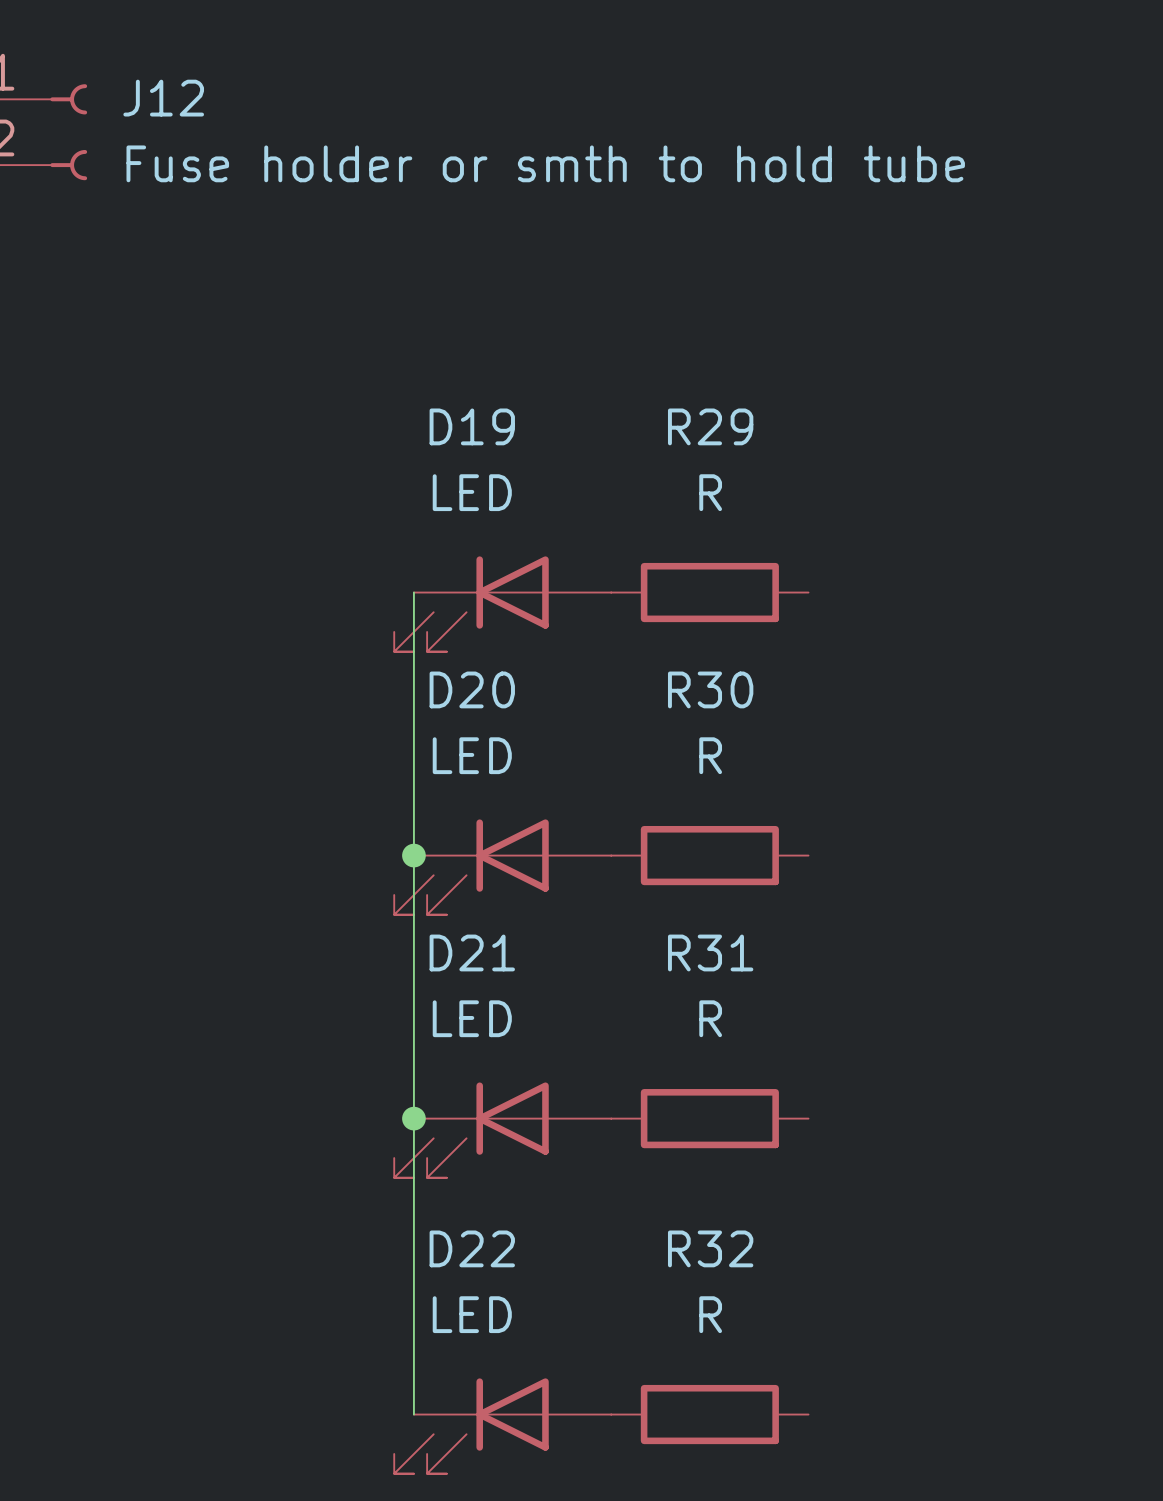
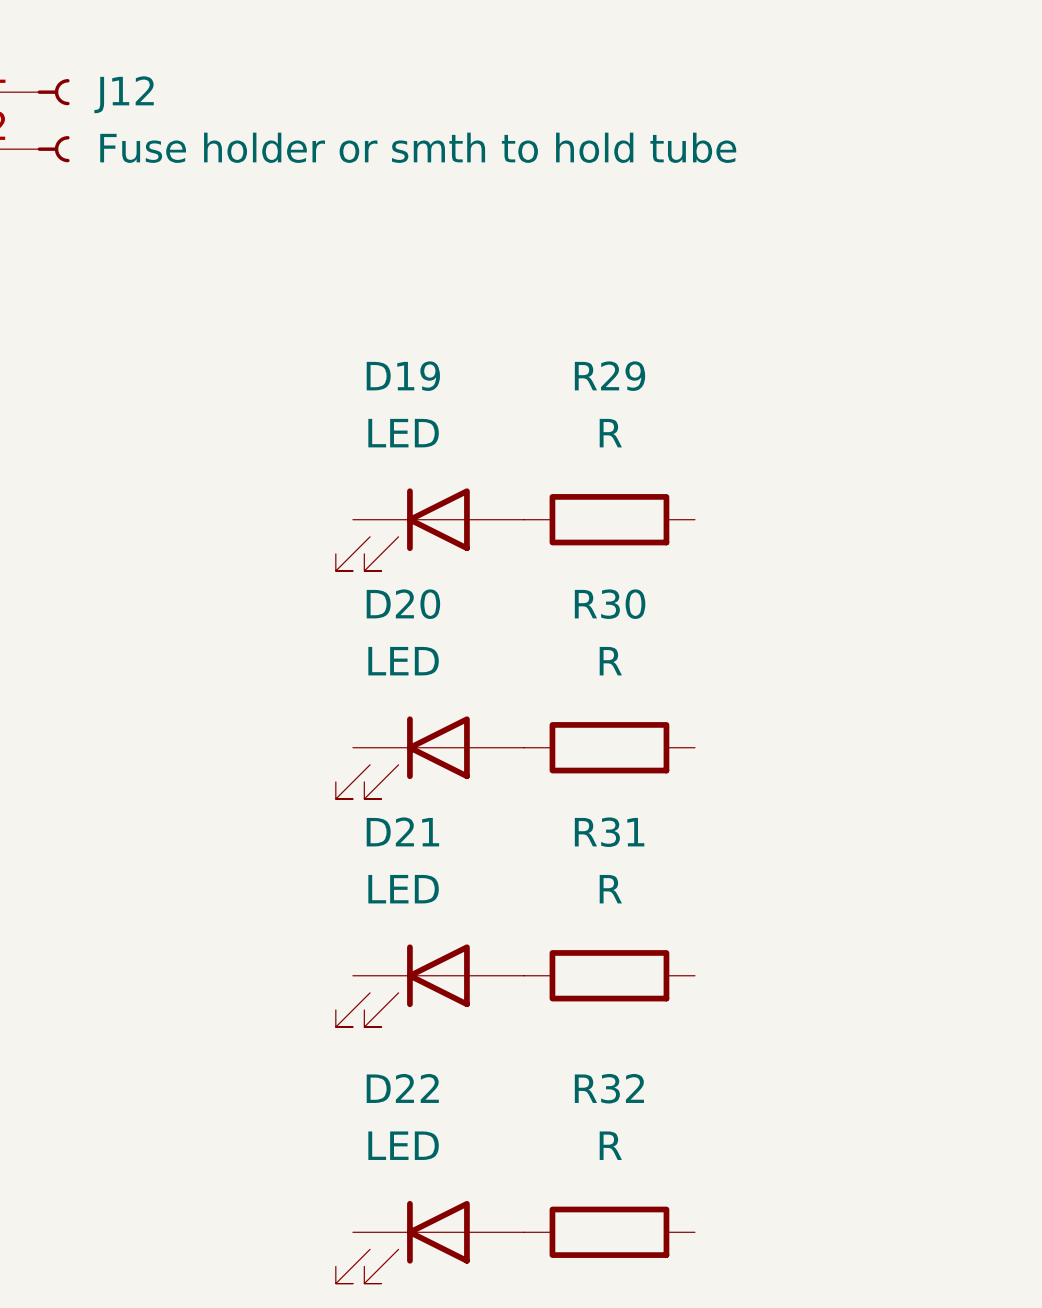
wire: (413, 592) (413, 1414) -> none
junction: (413, 855) -> none
junction: (413, 1118) -> none

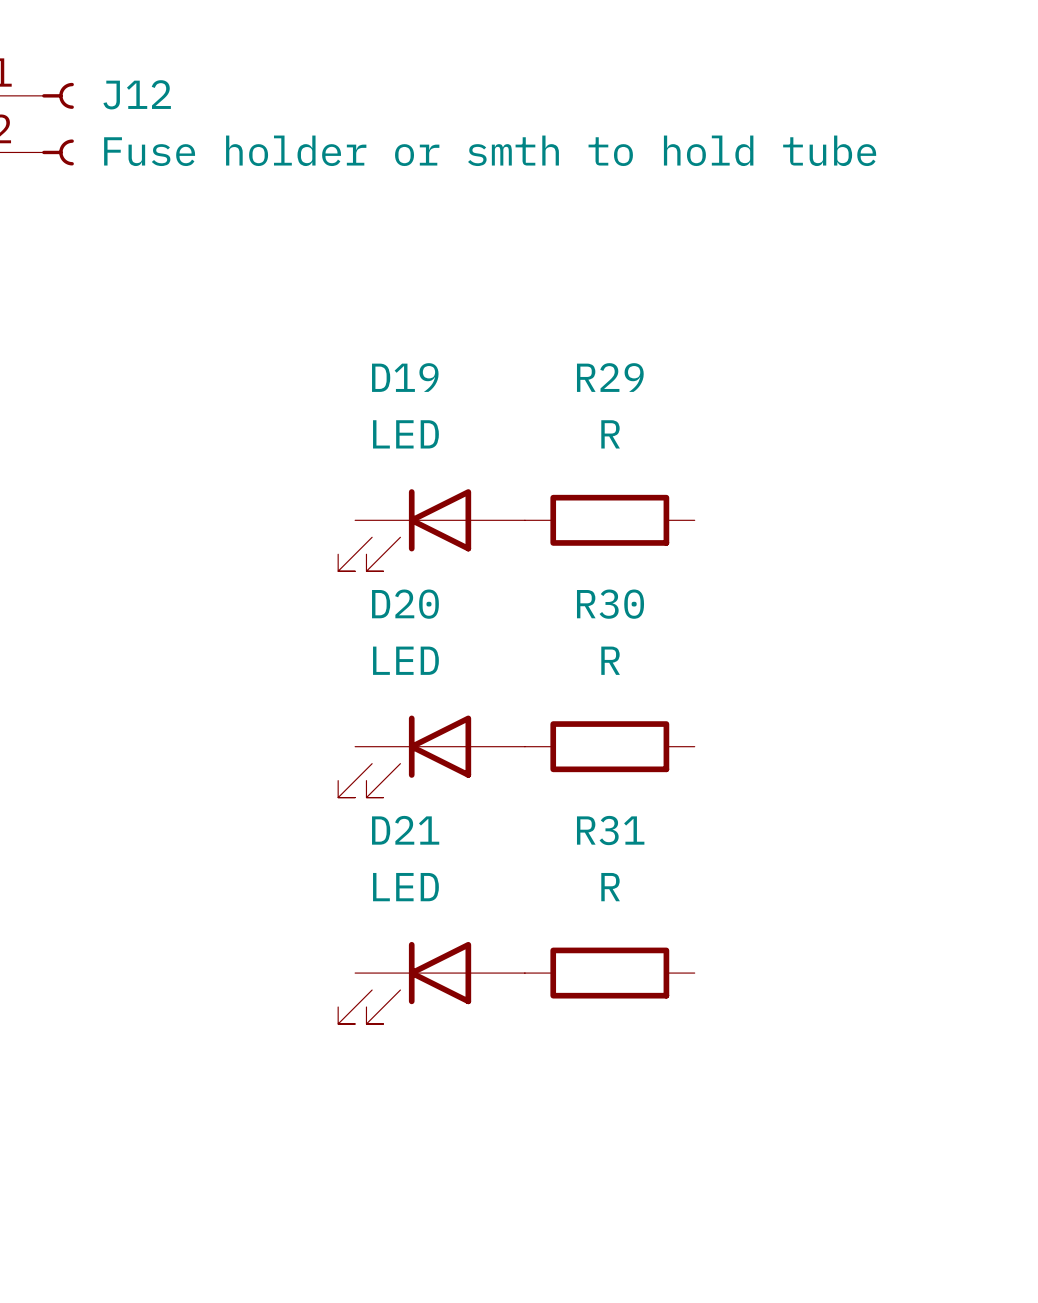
R32: R (609, 1232) -> none
D22: LED (429, 1242) -> none

